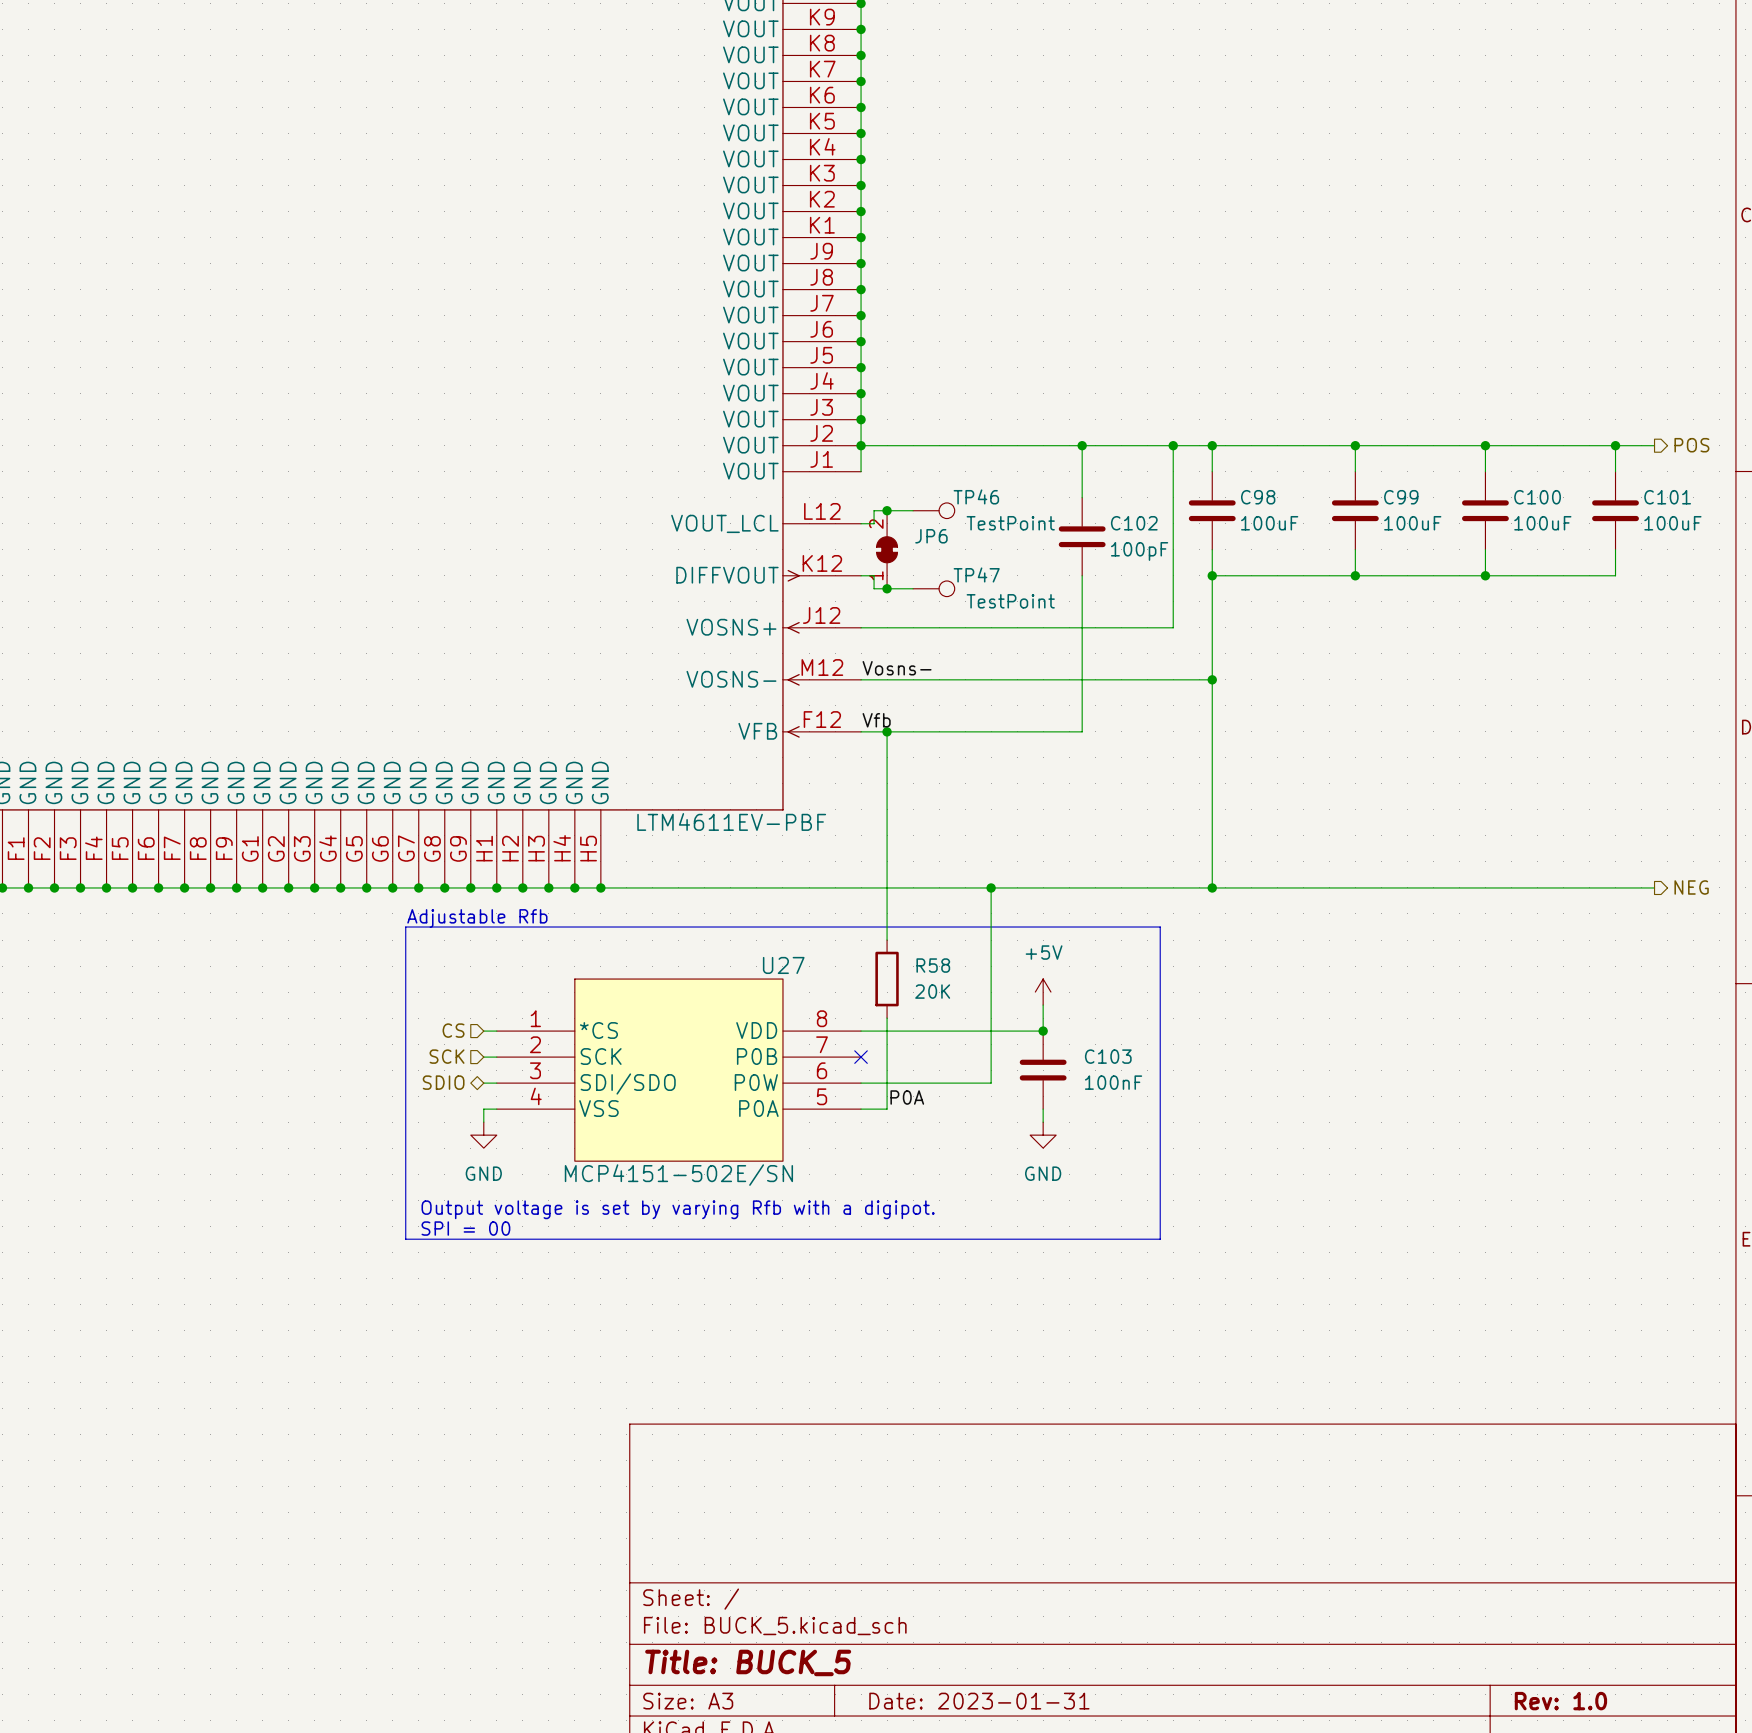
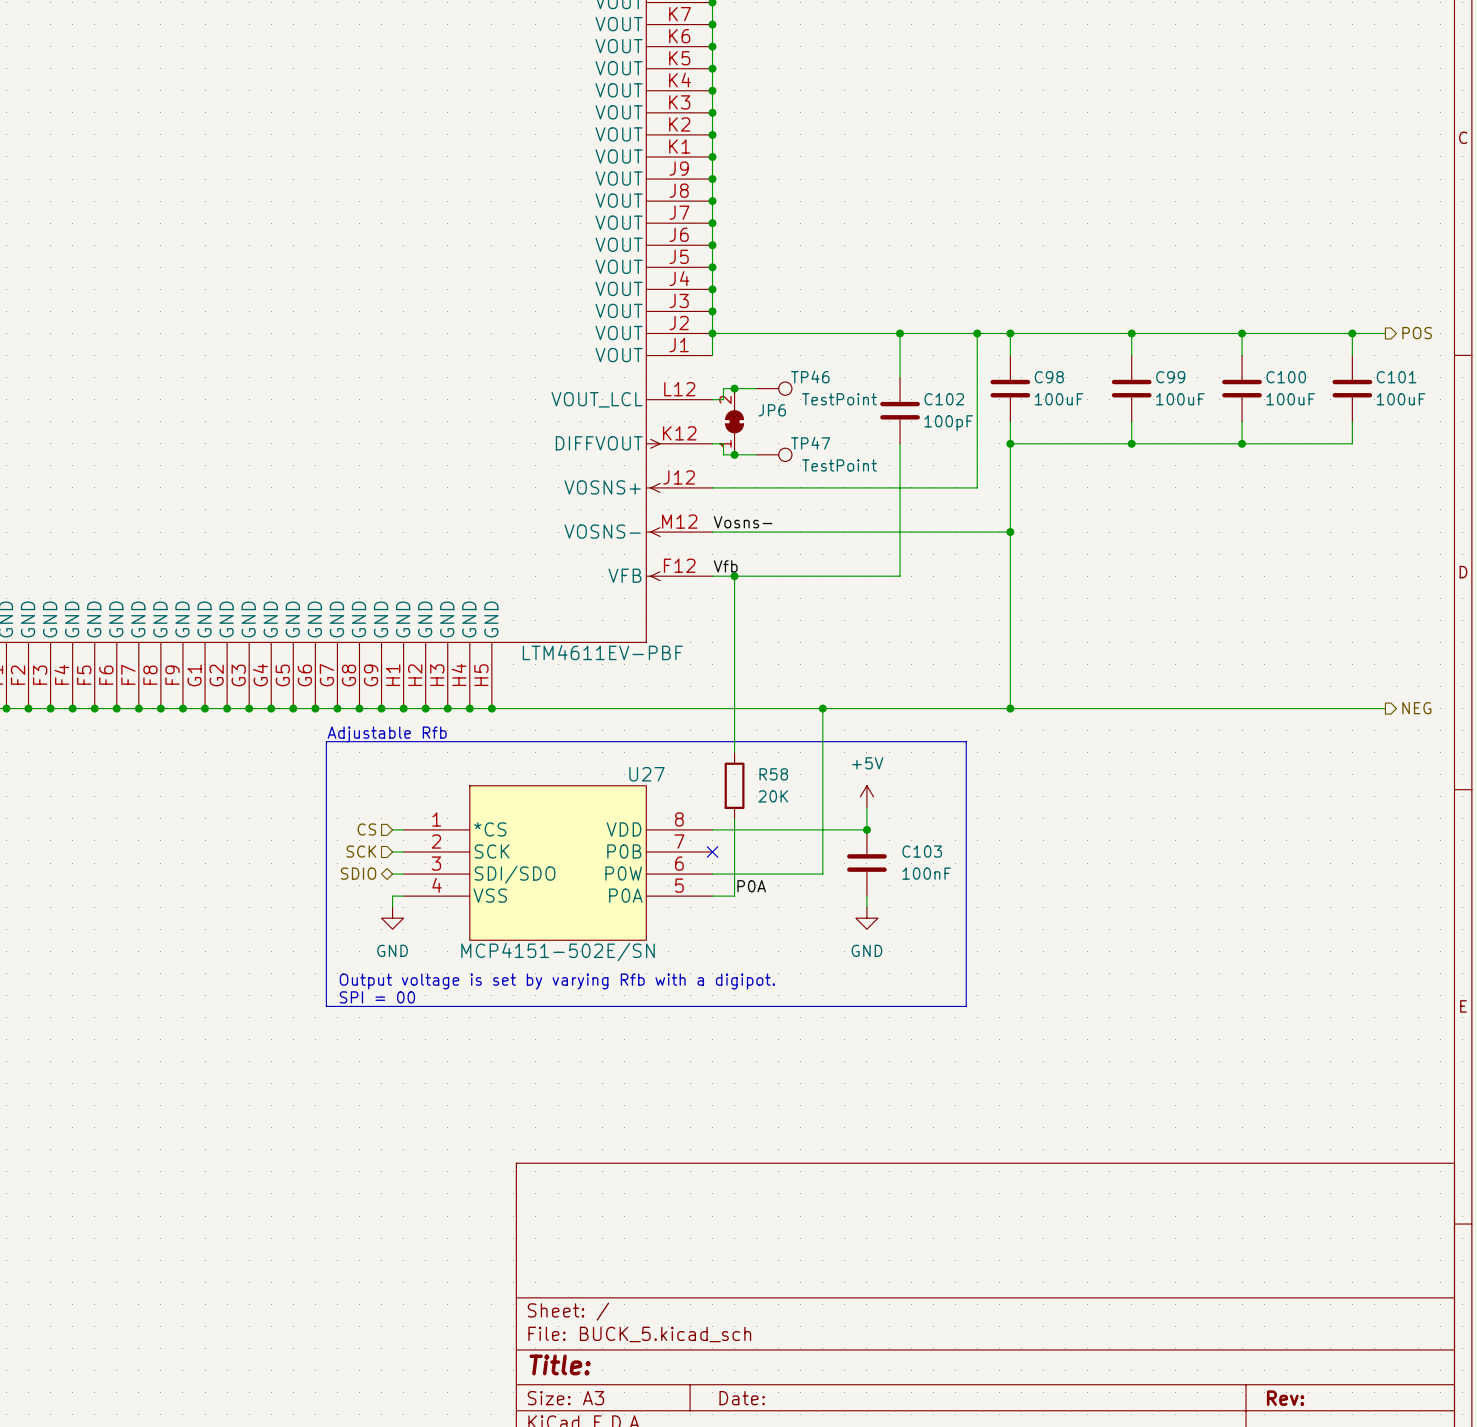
title block: Title: BUCK_5 (748, 1662) -> Title: (560, 1364)
title block: Date: 2023-01-31 (979, 1701) -> Date: (742, 1398)
title block: Rev: 1.0 (1560, 1701) -> Rev: (1285, 1398)

